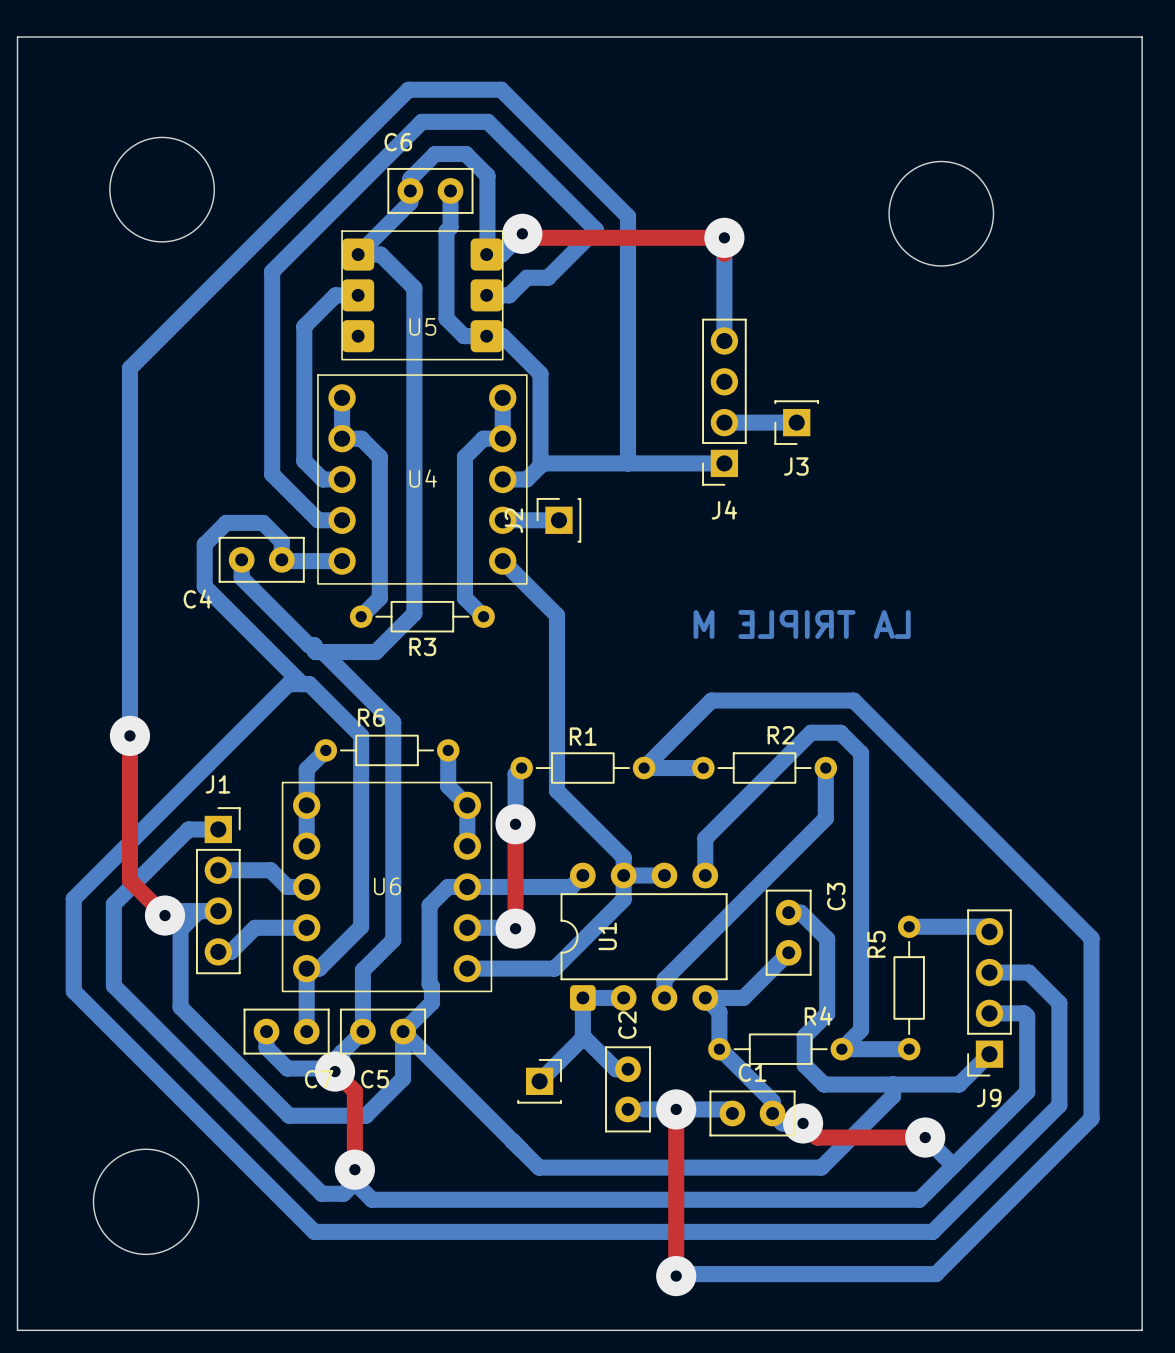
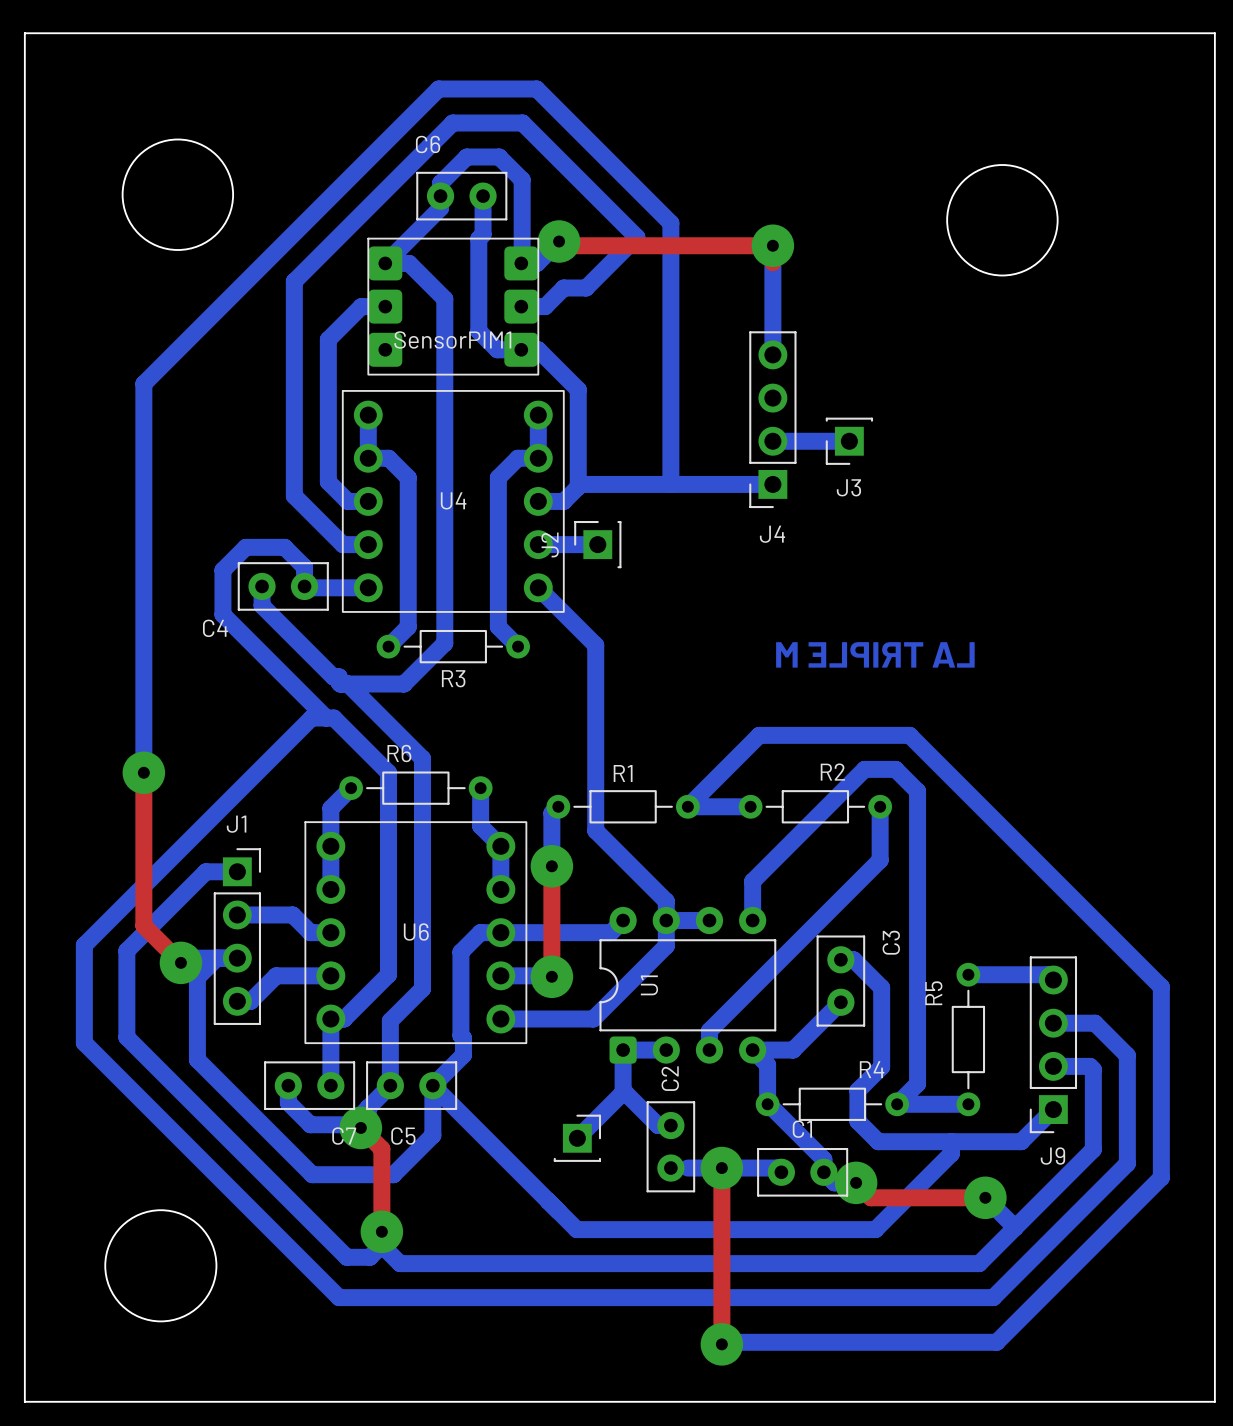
U5 name: U5 (422, 326) -> SensorPIM1 (452, 339)

